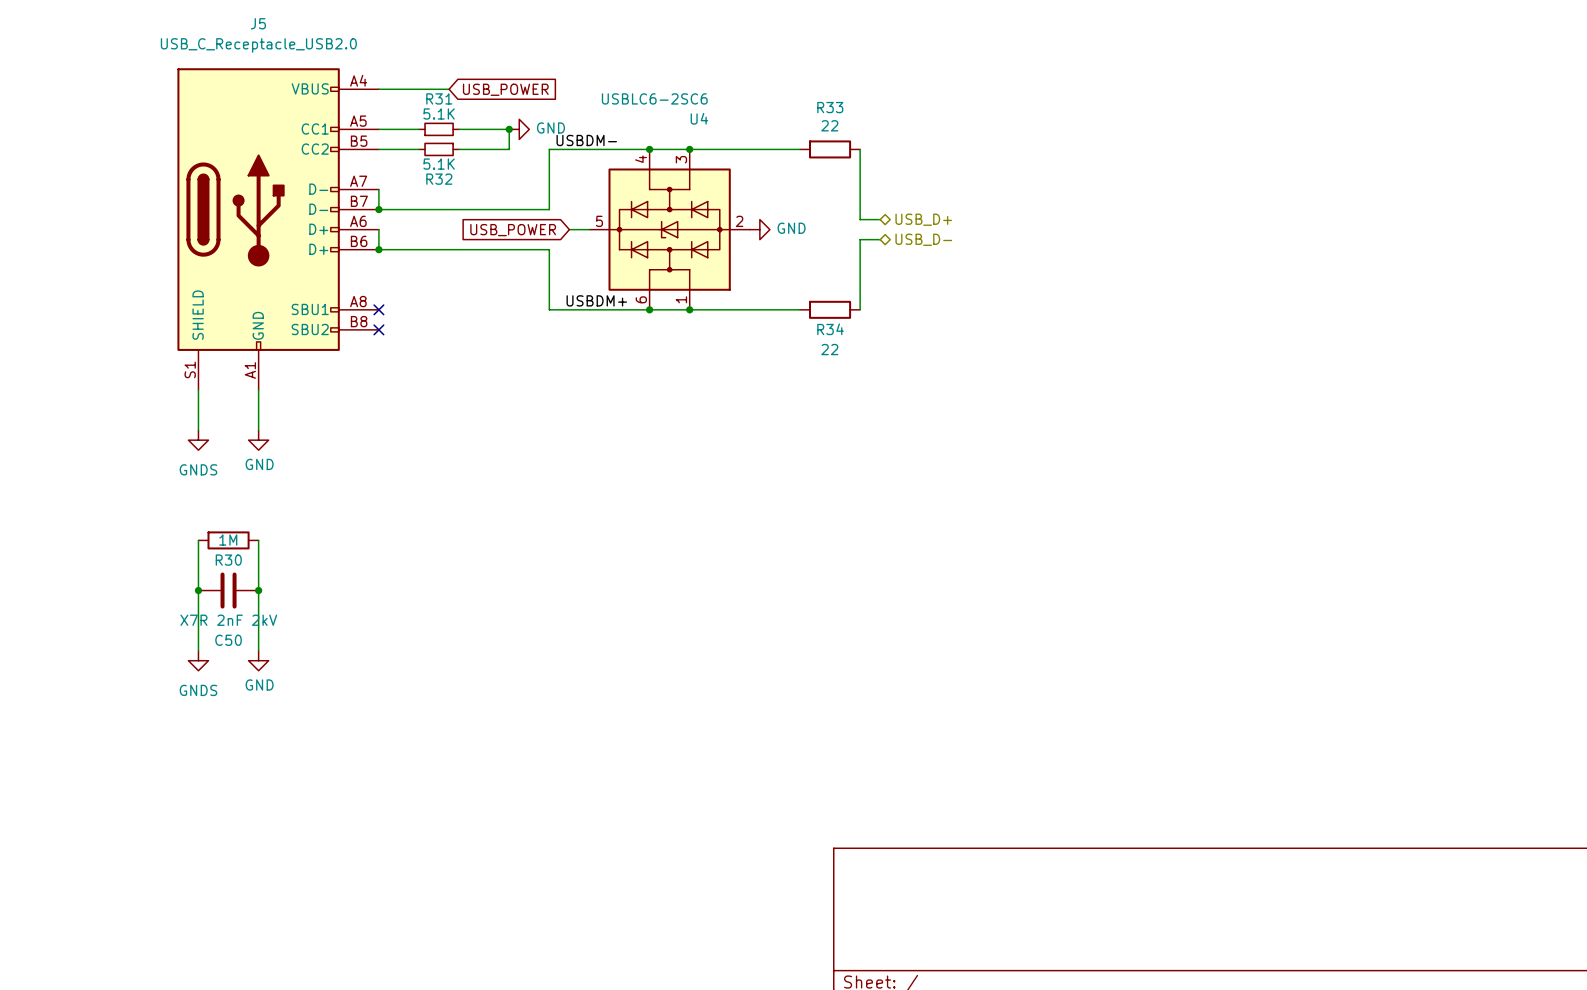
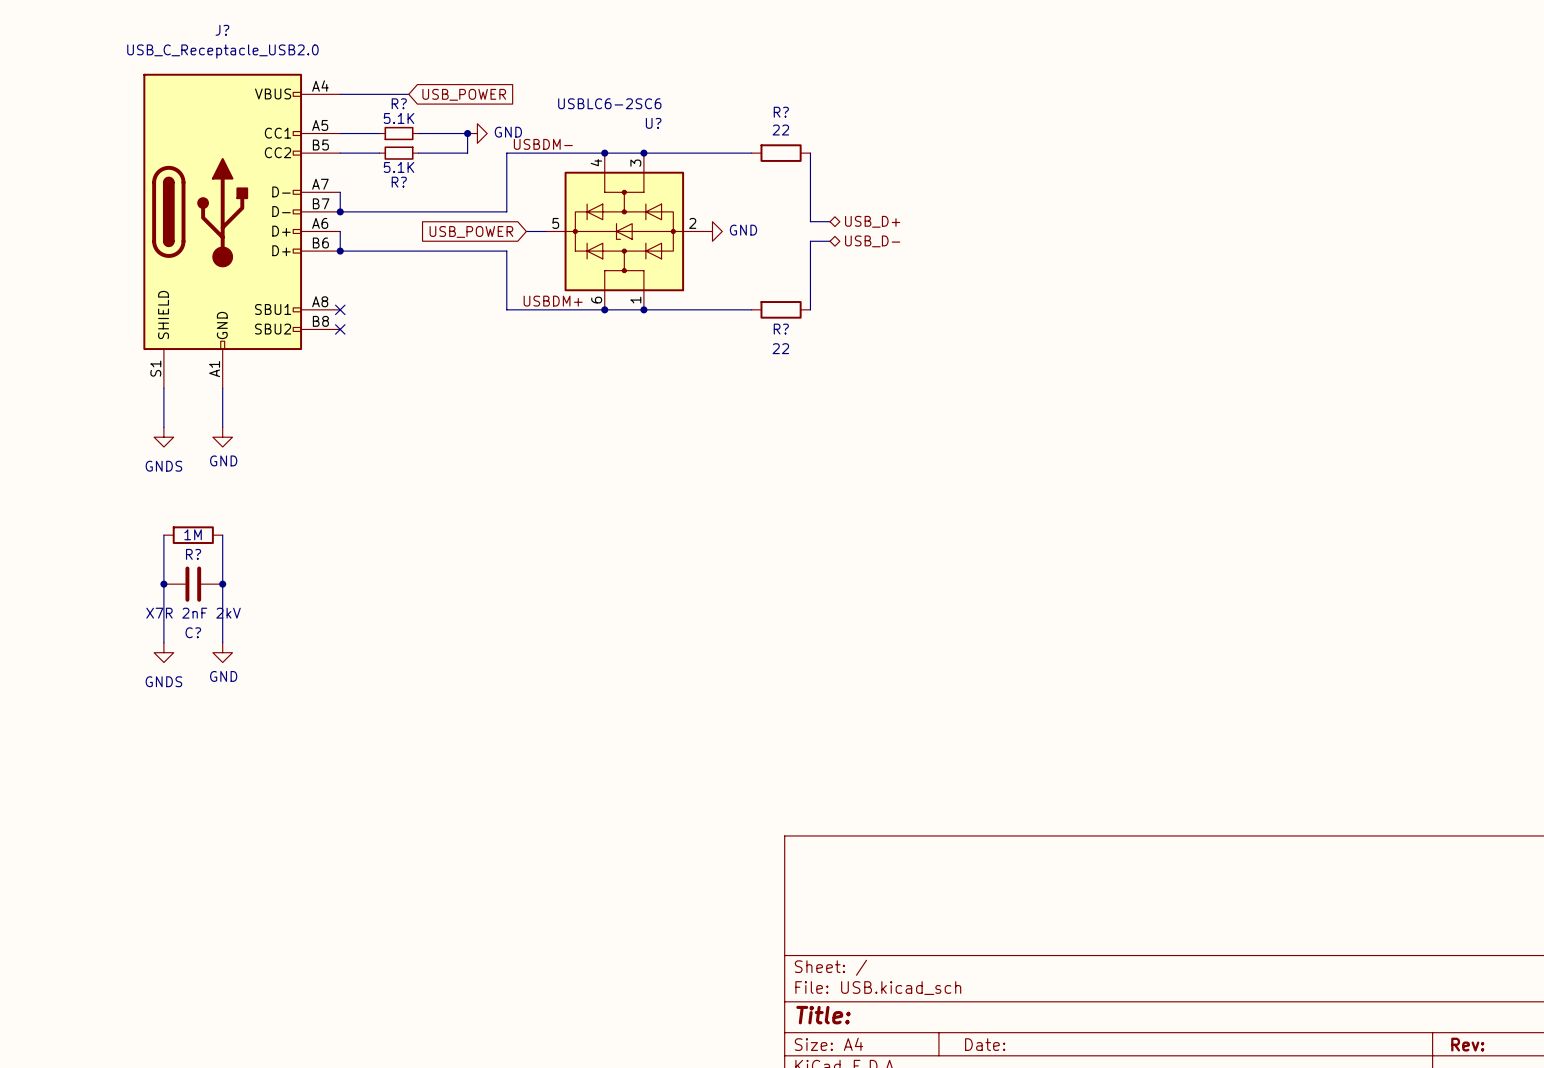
J5 name: J5 (258, 23) -> J? (222, 30)
R31 name: R31 (439, 98) -> R? (399, 103)
R33 name: R33 (830, 107) -> R? (781, 112)
U4 name: U4 (699, 118) -> U? (653, 123)
R32 name: R32 (439, 179) -> R? (399, 182)
R34 name: R34 (830, 329) -> R? (781, 329)
R30 name: R30 (228, 560) -> R? (193, 554)
C50 name: C50 (228, 640) -> C? (193, 632)

